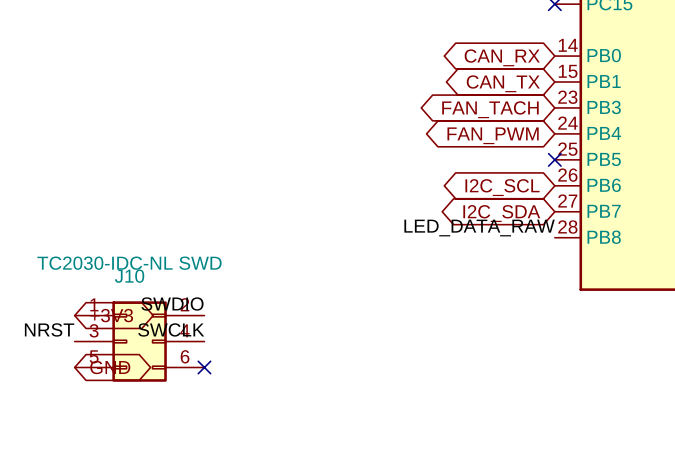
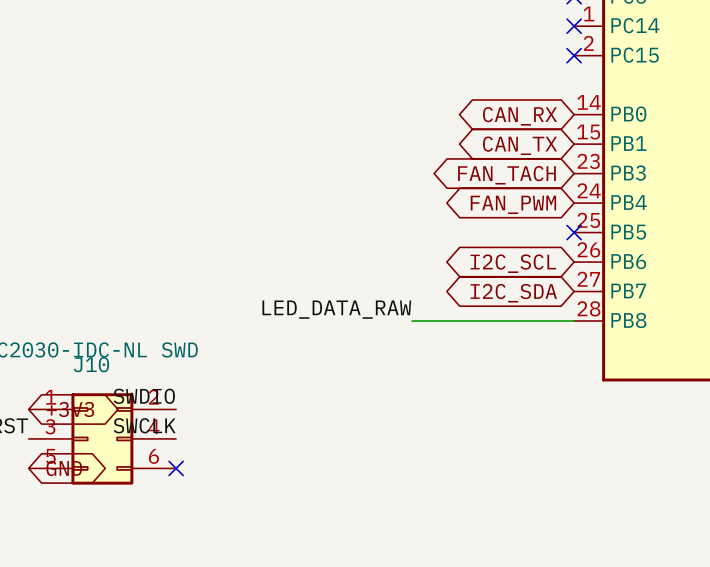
label position: LED_DATA_RAW (479, 228) -> LED_DATA_RAW (336, 309)
wire: none -> (411, 321) (574, 321)

